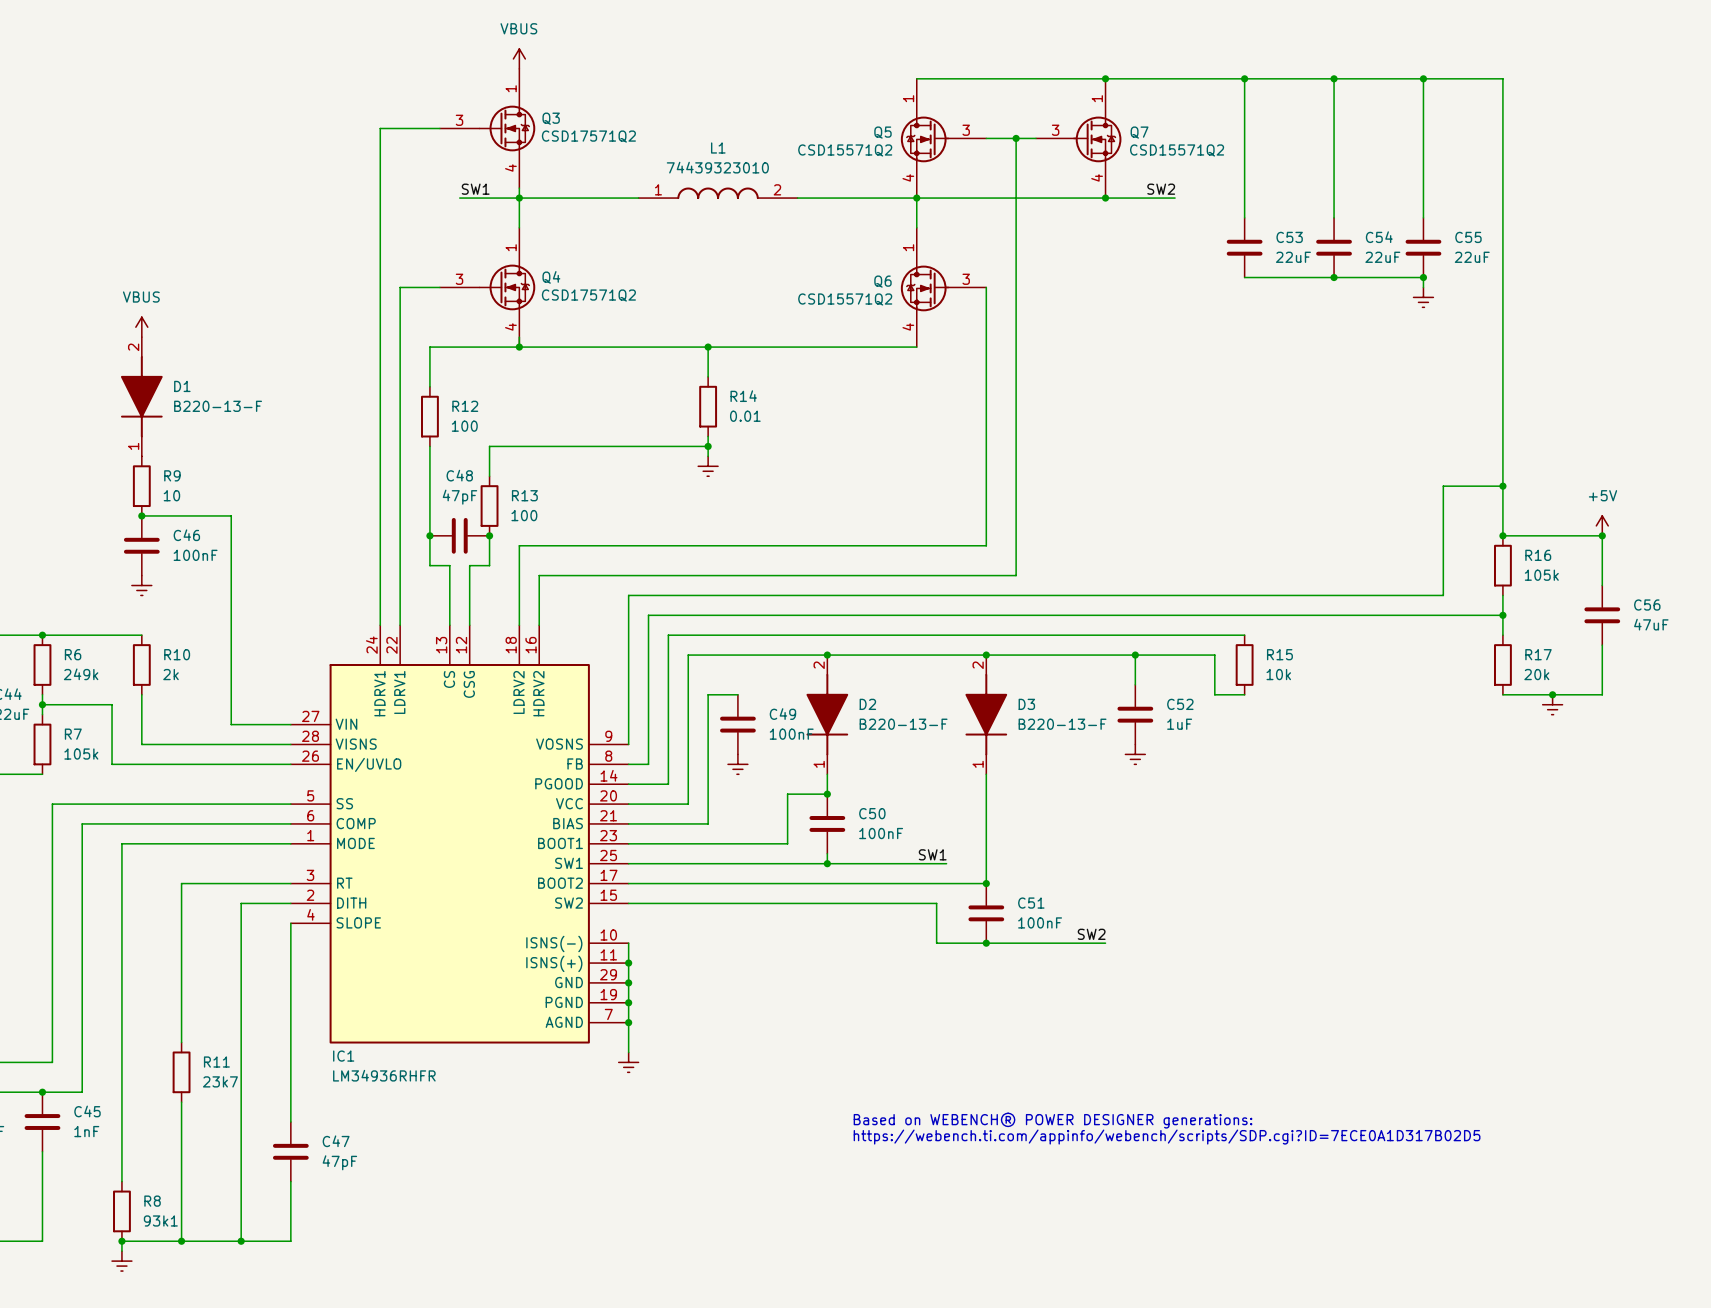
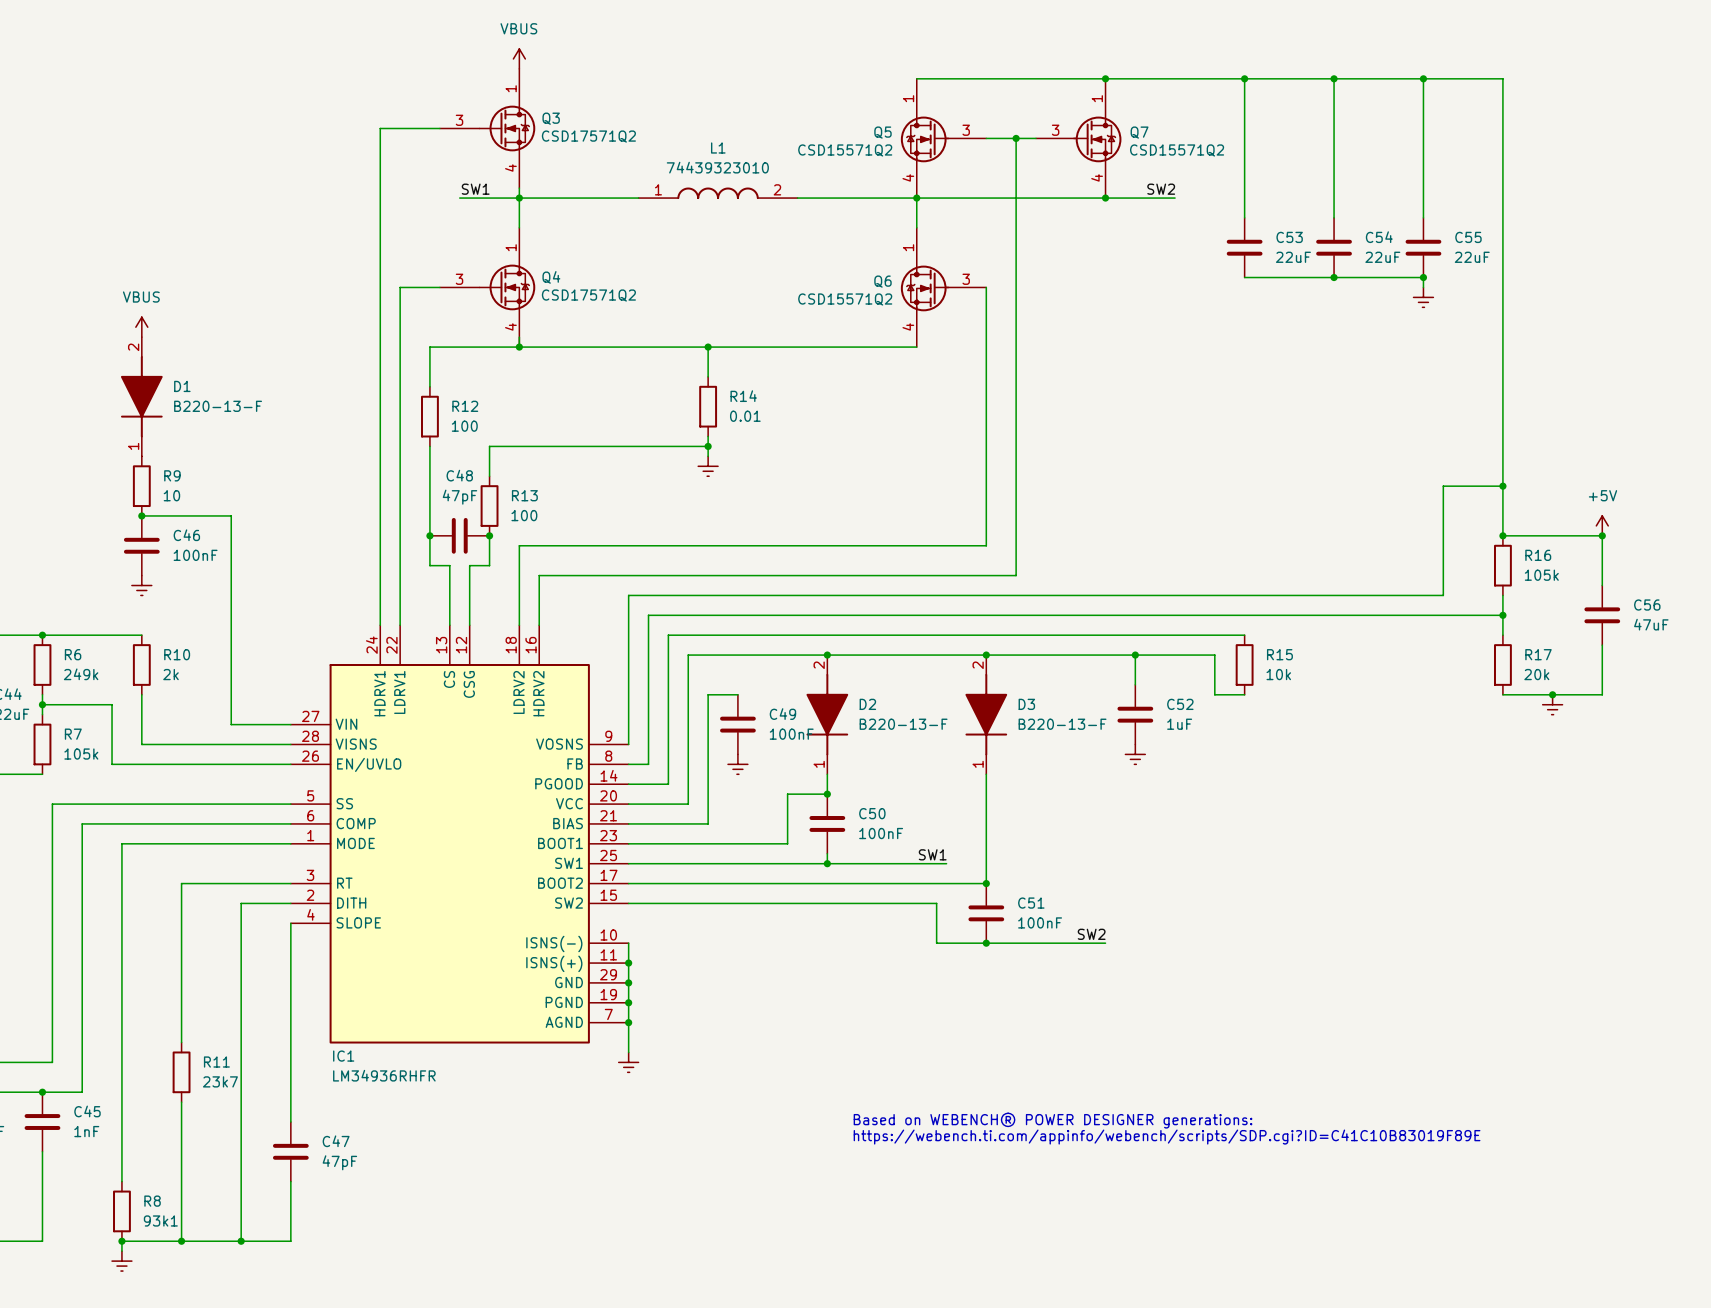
text: https://webench.ti.com/appinfo/webench/scripts/SDP.cgi?ID=7ECE0A1D317B02D5 (1167, 1137) -> https://webench.ti.com/appinfo/webench/scripts/SDP.cgi?ID=C41C10B83019F89E (1167, 1137)

